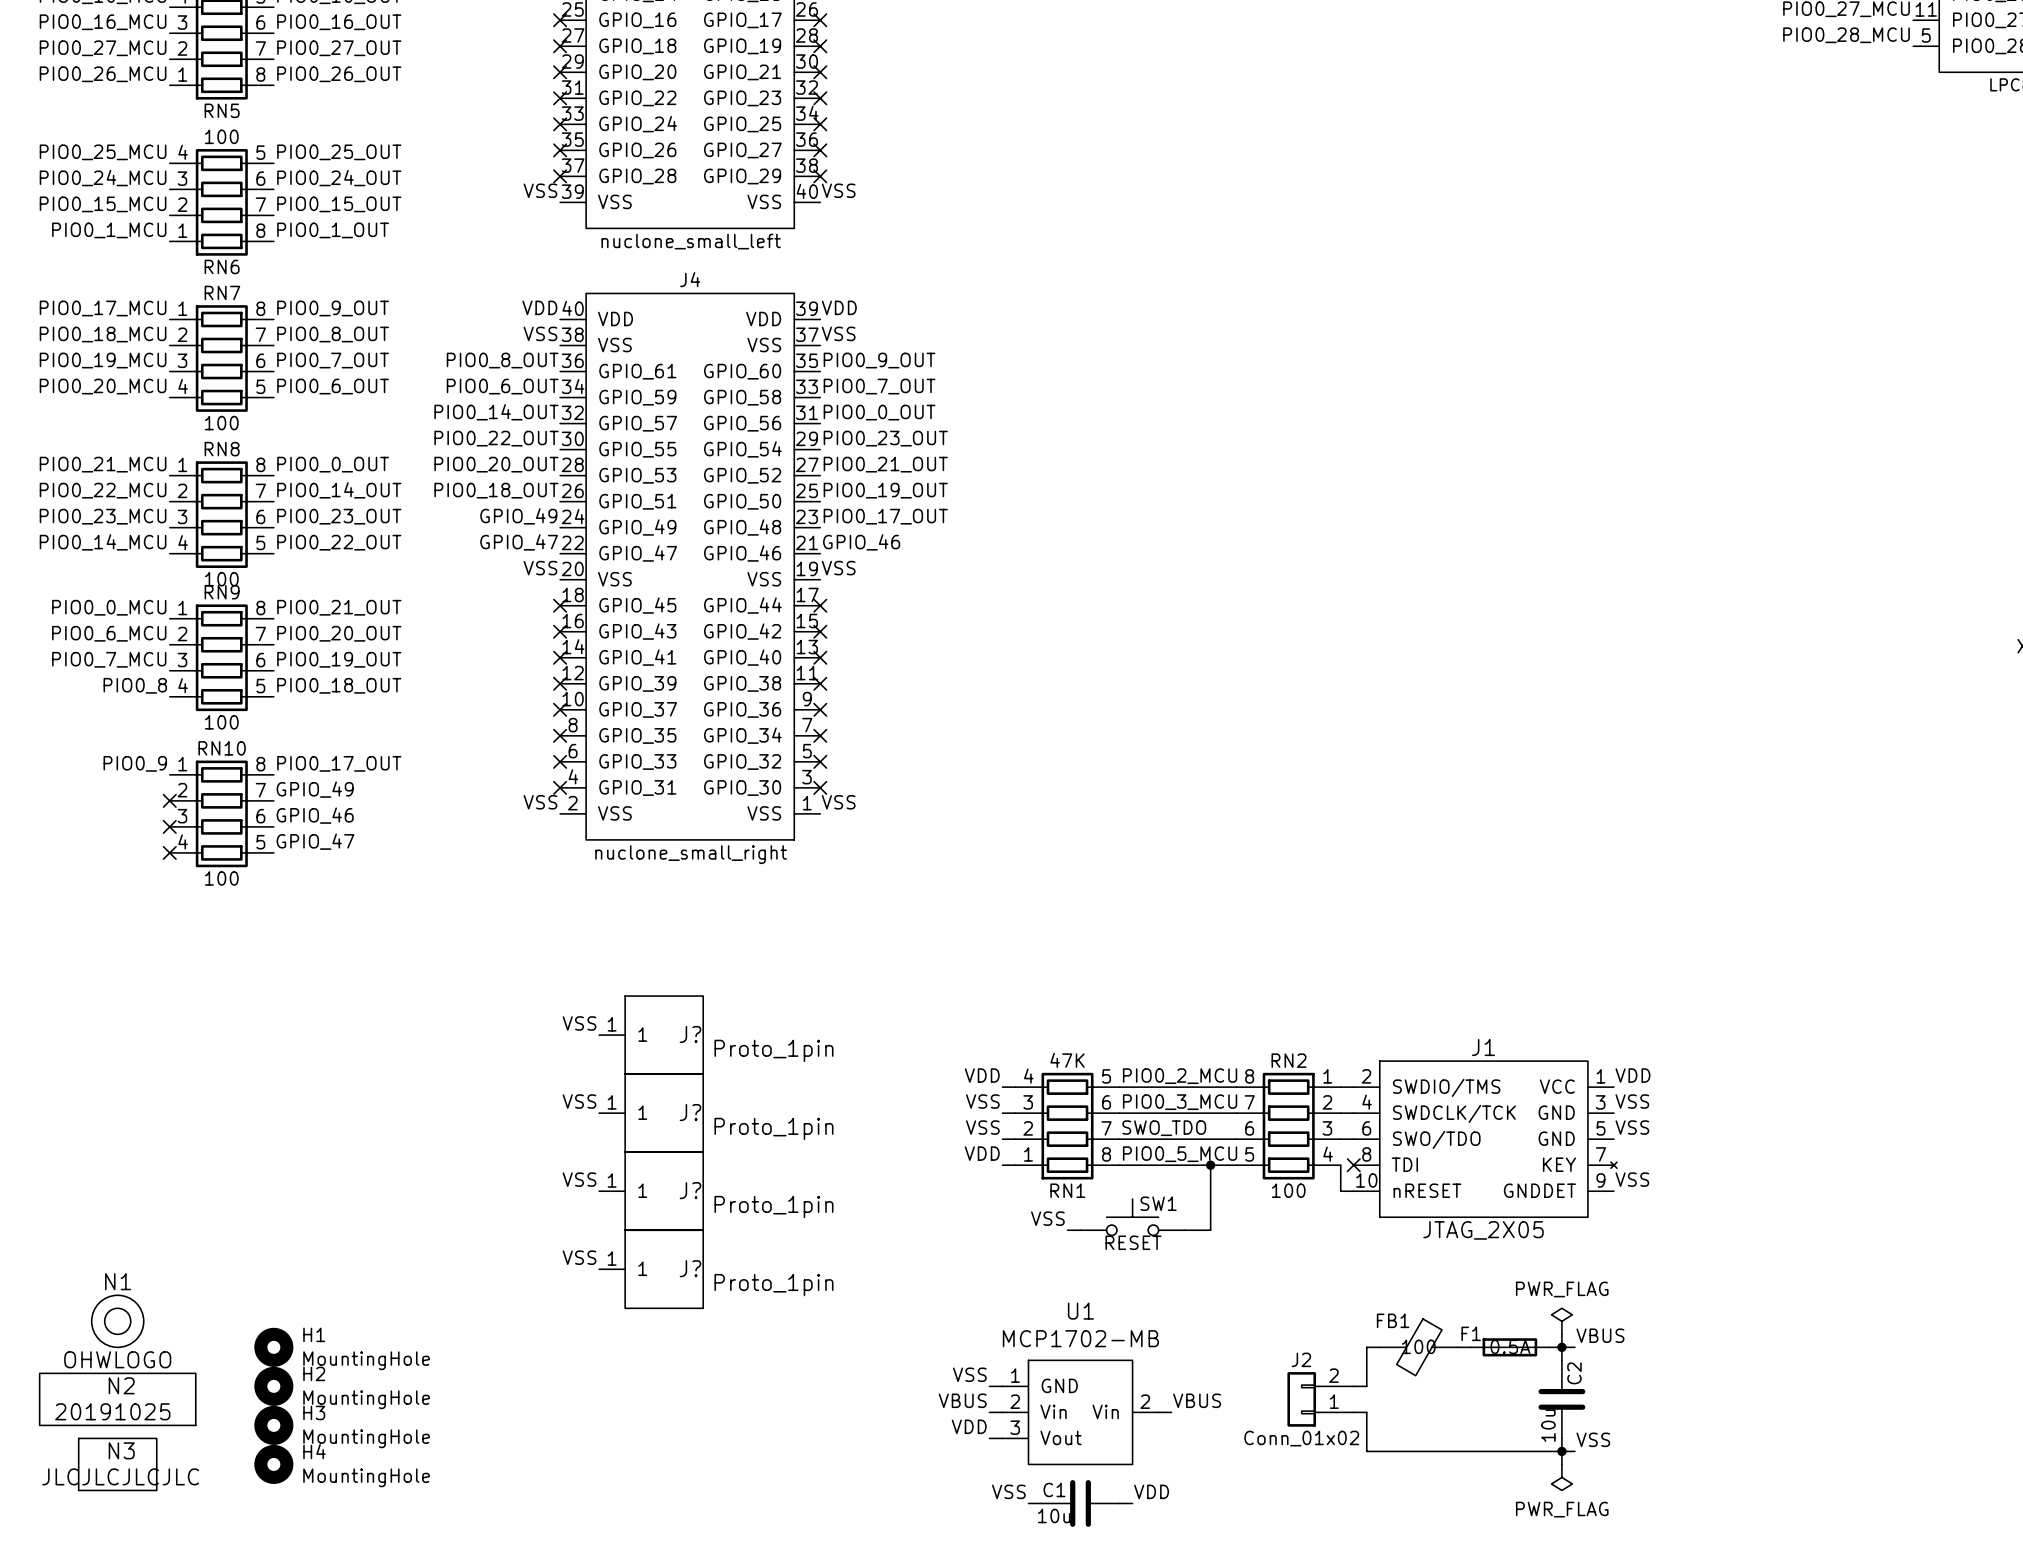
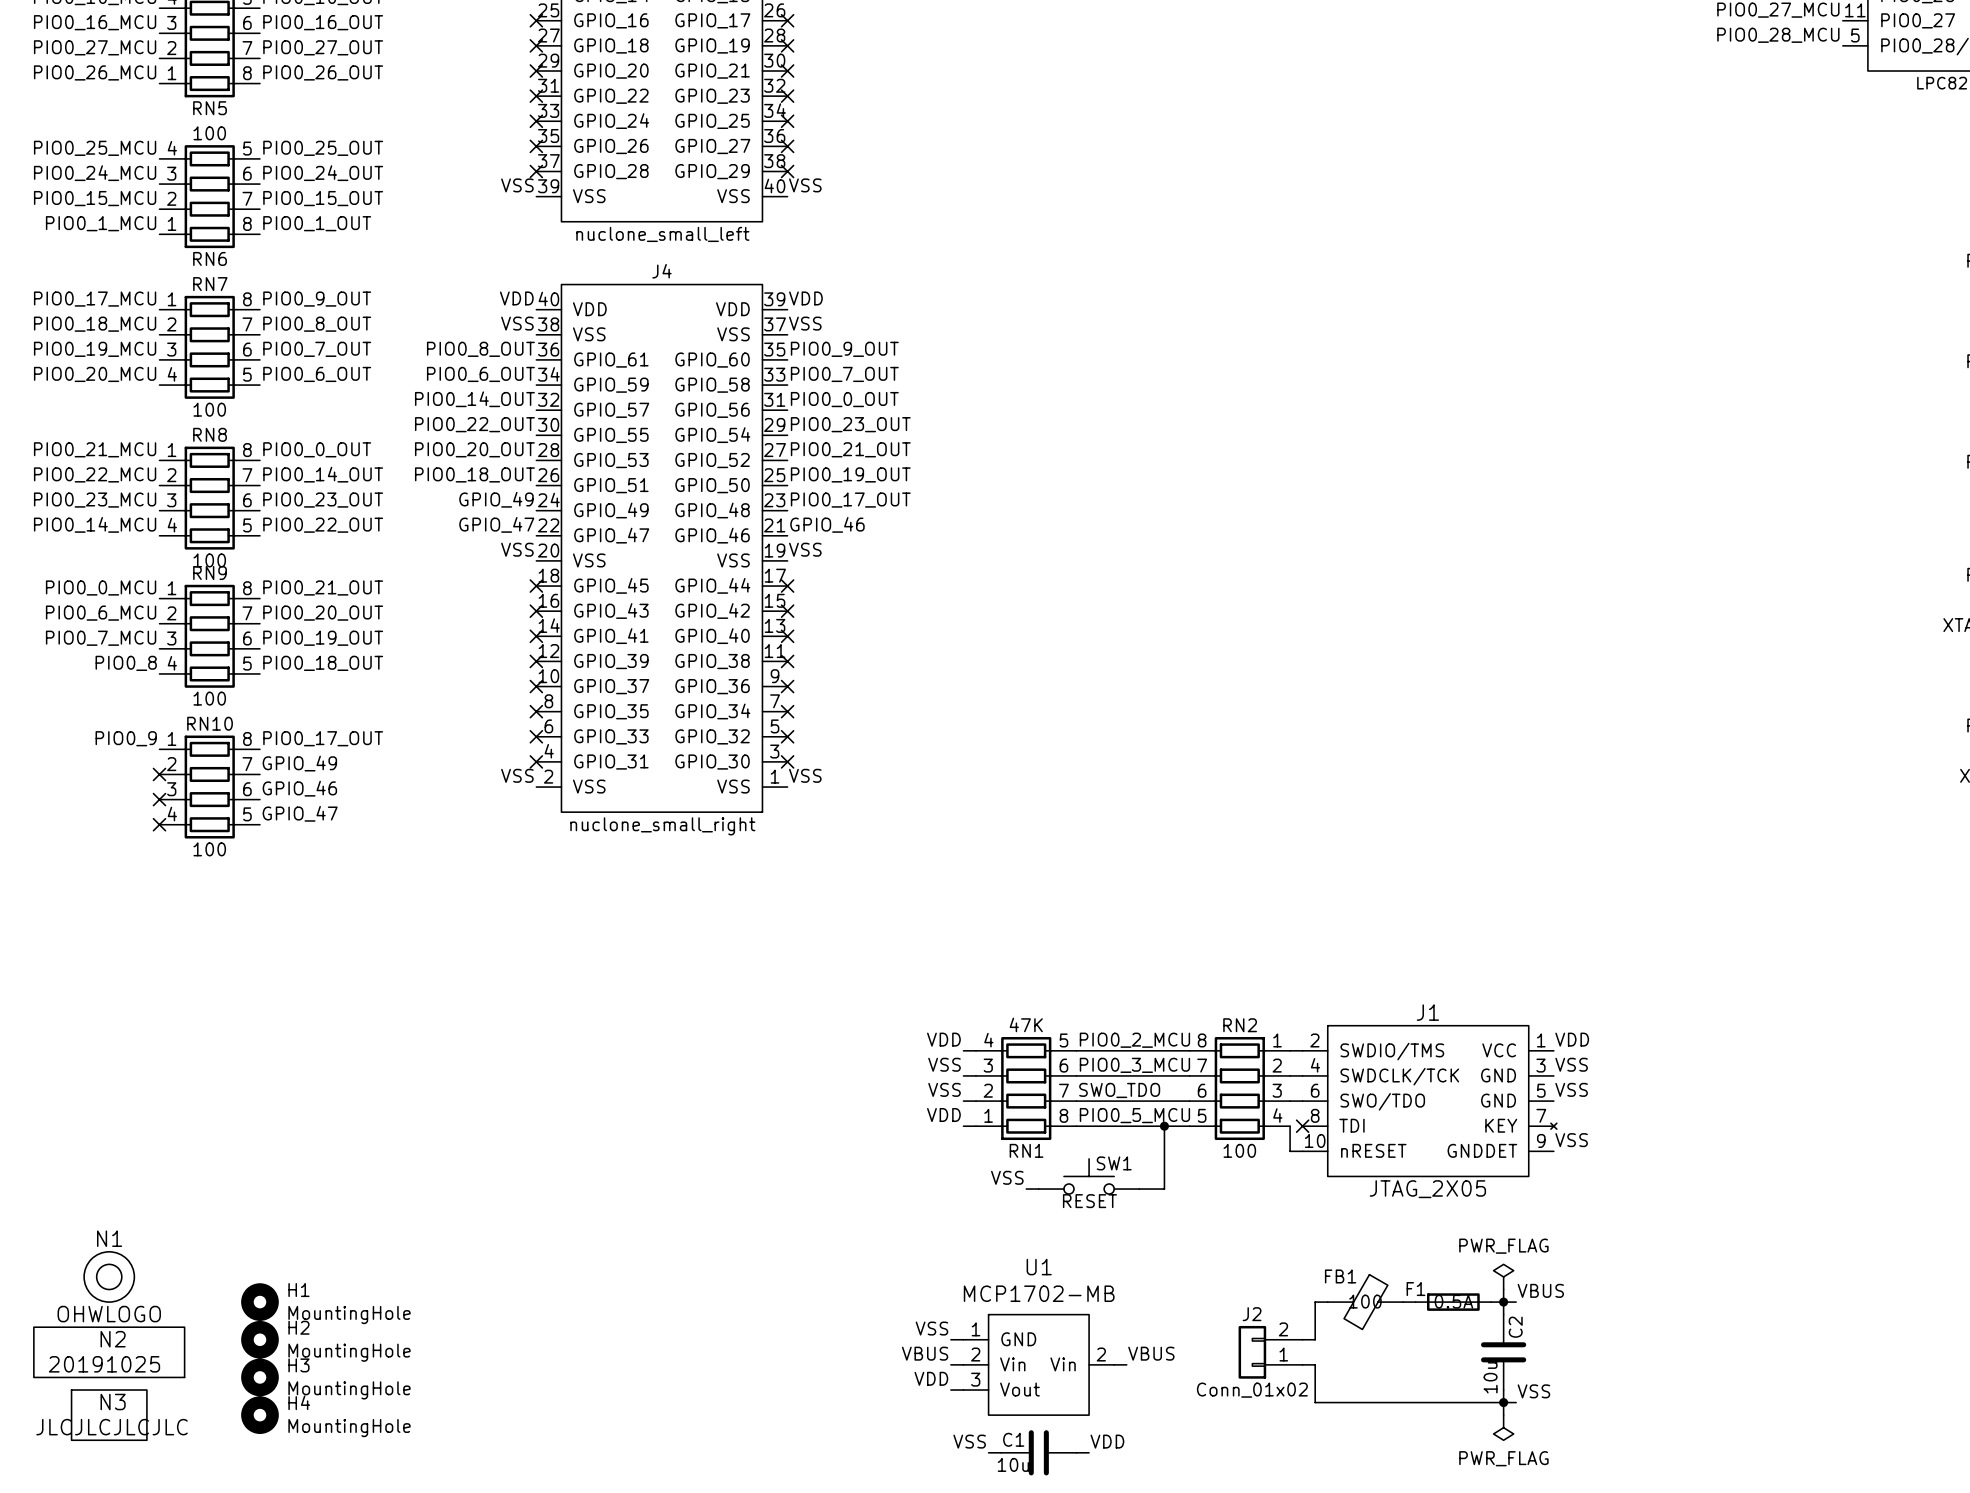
label: VSS (579, 1023) -> none
J?: Proto_1pin (651, 1035) -> none
label: VSS (579, 1101) -> none
J?: Proto_1pin (651, 1113) -> none
label: VSS (579, 1179) -> none
J?: Proto_1pin (651, 1191) -> none
label: VSS (579, 1257) -> none
J?: Proto_1pin (651, 1269) -> none

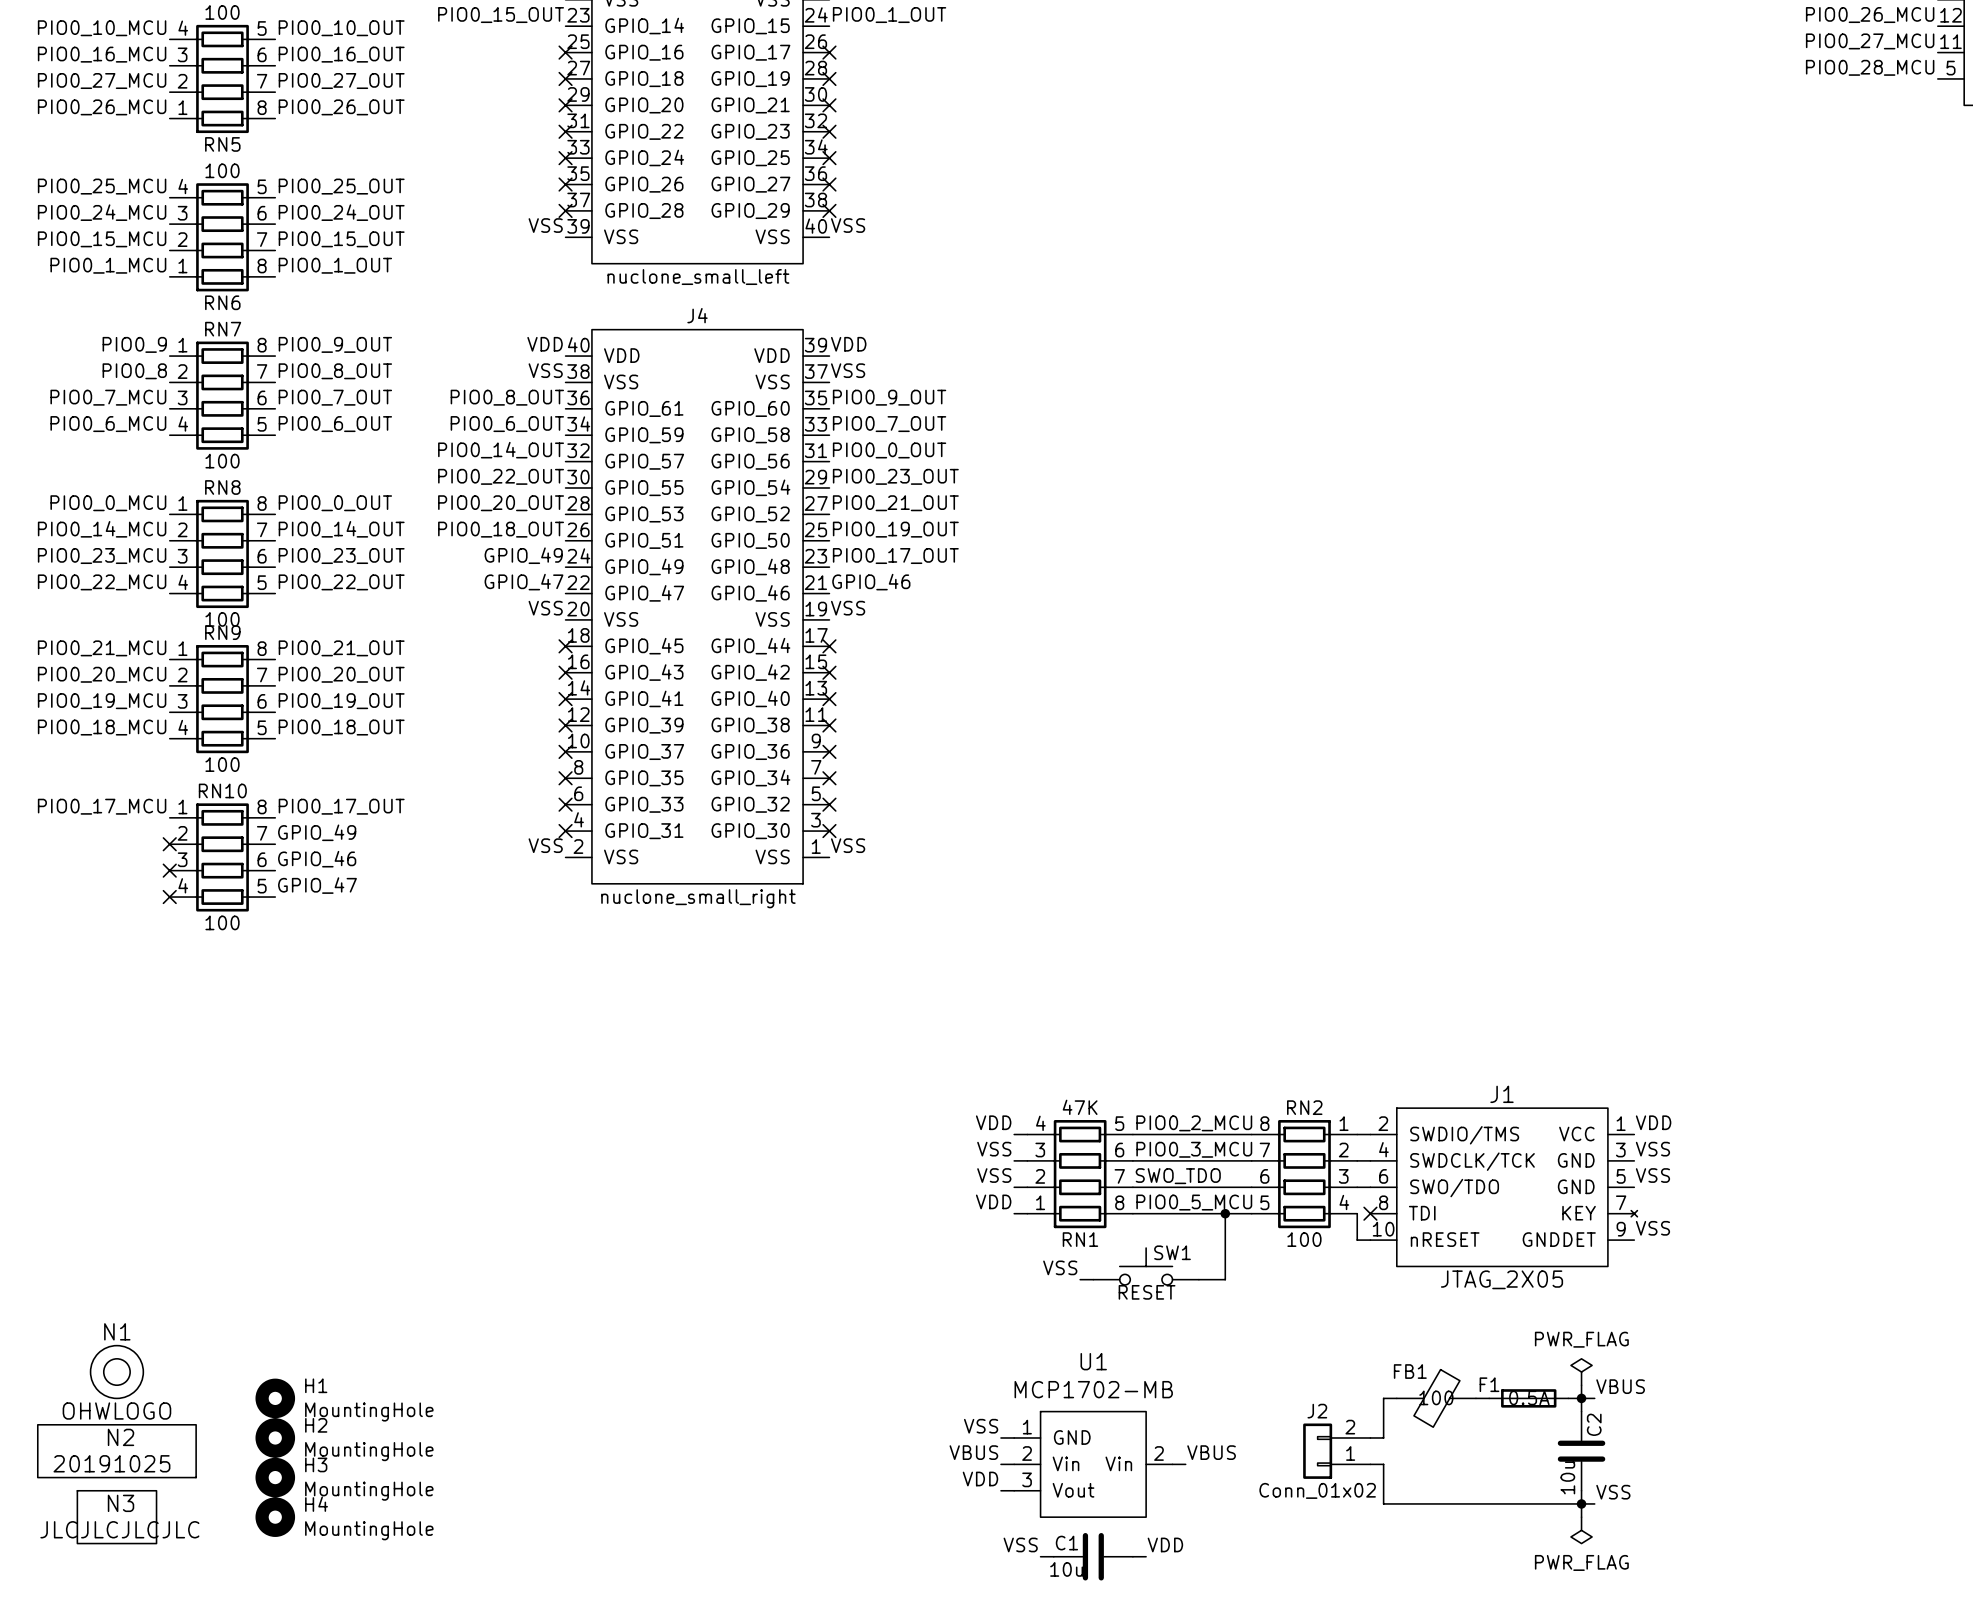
label: PIO0_17_MCU (95, 299) -> PIO0_9 (134, 344)
label: PIO0_18_MCU (95, 324) -> PIO0_8 (134, 371)
label: PIO0_19_MCU (95, 349) -> PIO0_7_MCU (108, 397)
label: PIO0_20_MCU (95, 374) -> PIO0_6_MCU (108, 424)
label: PIO0_21_MCU (95, 449) -> PIO0_0_MCU (108, 503)
label: PIO0_22_MCU (95, 474) -> PIO0_14_MCU (102, 529)
label: PIO0_14_MCU (95, 524) -> PIO0_22_MCU (102, 582)
label: PIO0_0_MCU (101, 587) -> PIO0_21_MCU (102, 648)
label: PIO0_6_MCU (101, 613) -> PIO0_20_MCU (102, 674)
label: PIO0_7_MCU (101, 638) -> PIO0_19_MCU (102, 701)
label: PIO0_8 (126, 663) -> PIO0_18_MCU (102, 727)
label: PIO0_9 (126, 738) -> PIO0_17_MCU (102, 806)

